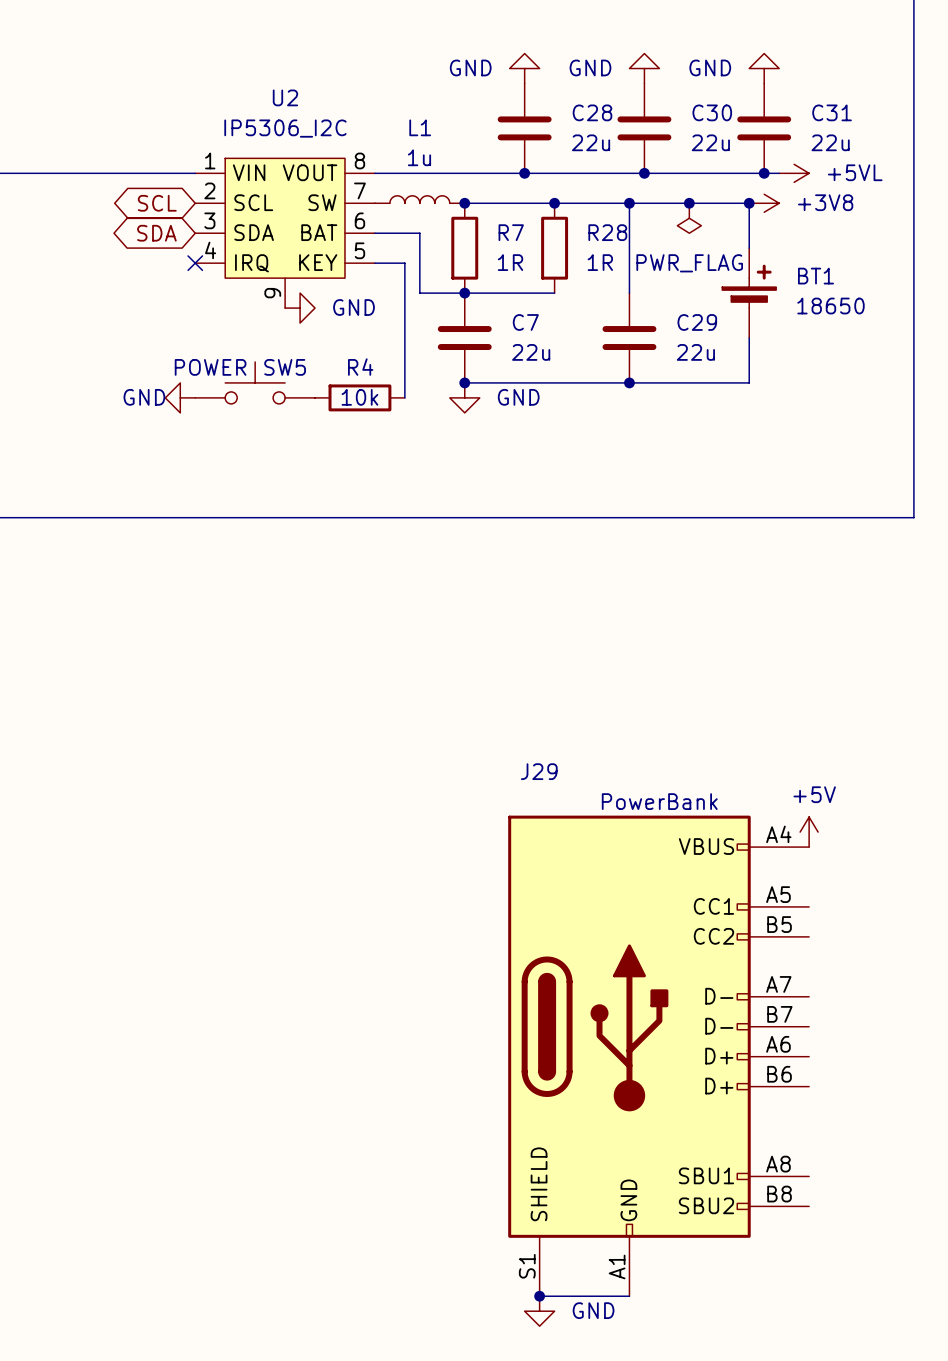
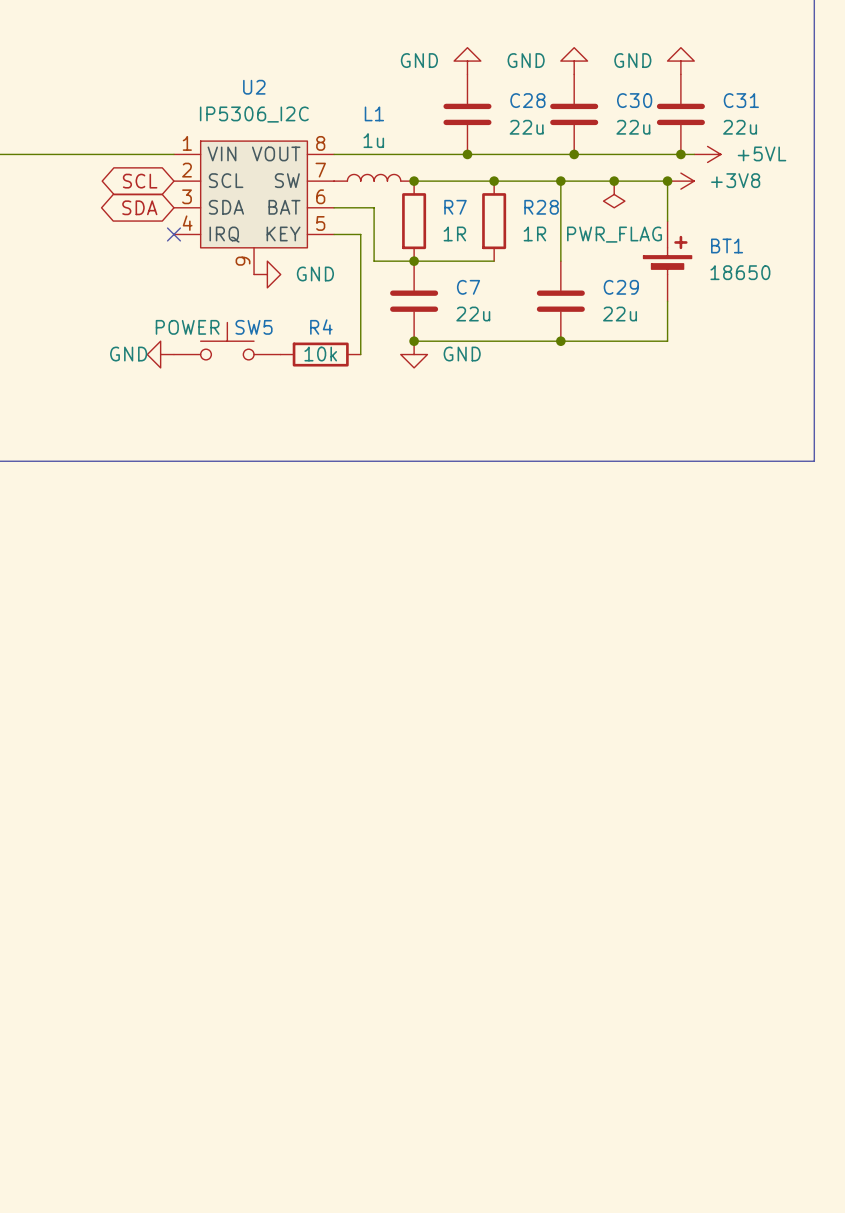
power symbol: +5V (809, 832) -> none
J29: PowerBank (658, 1055) -> none
wire: (539, 1296) (629, 1296) -> none
junction: (539, 1296) -> none
power symbol: GND (539, 1311) -> none

